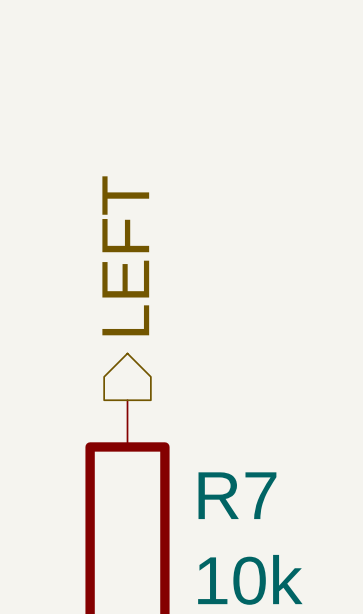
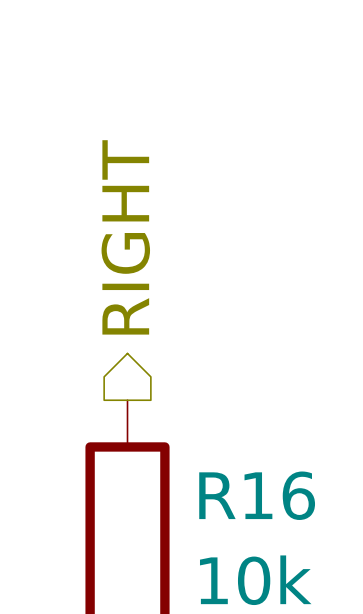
hierarchical label: LEFT (125, 255) -> RIGHT (125, 237)
R7 name: R7 (237, 495) -> R16 (257, 495)

